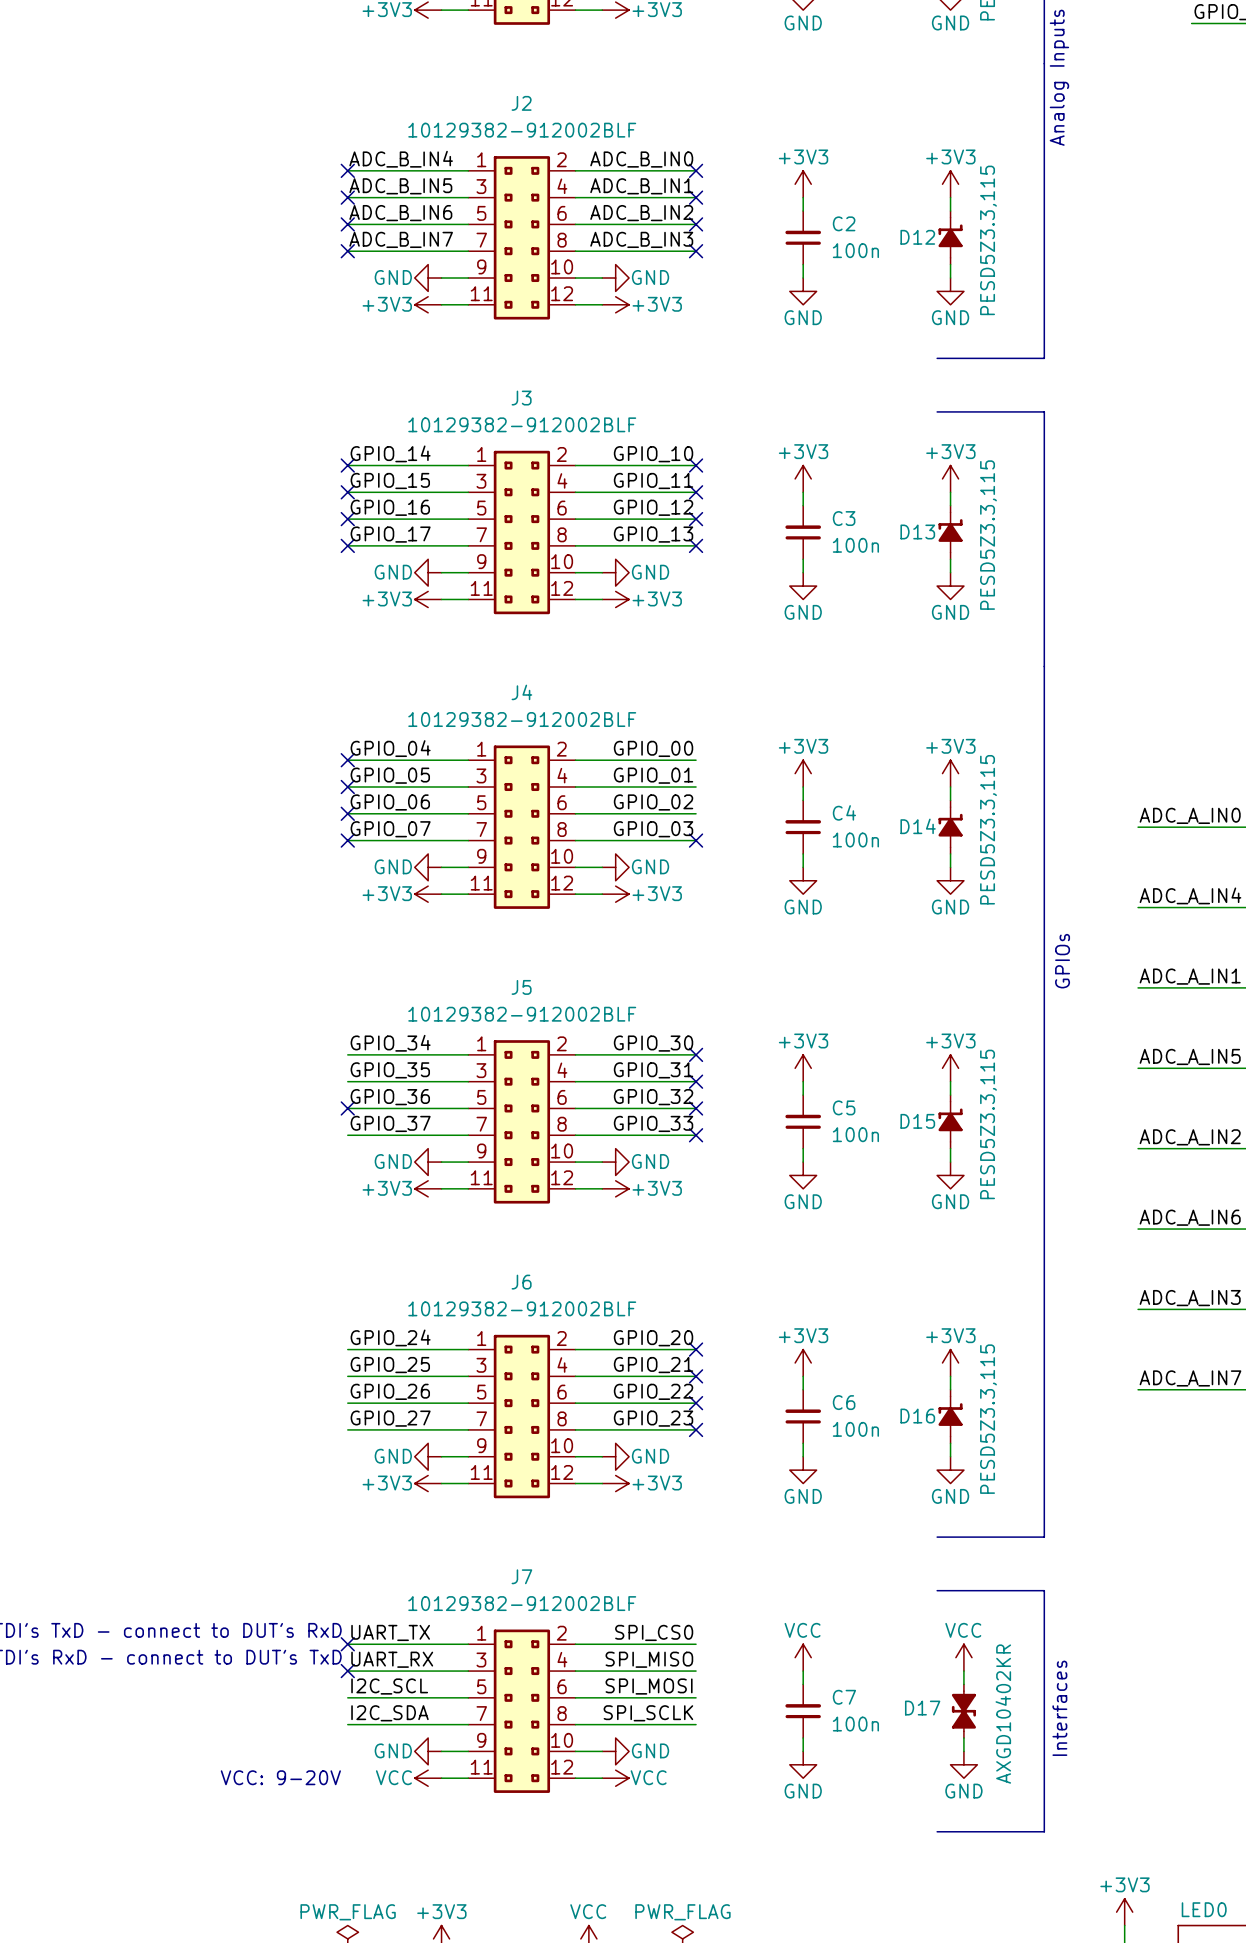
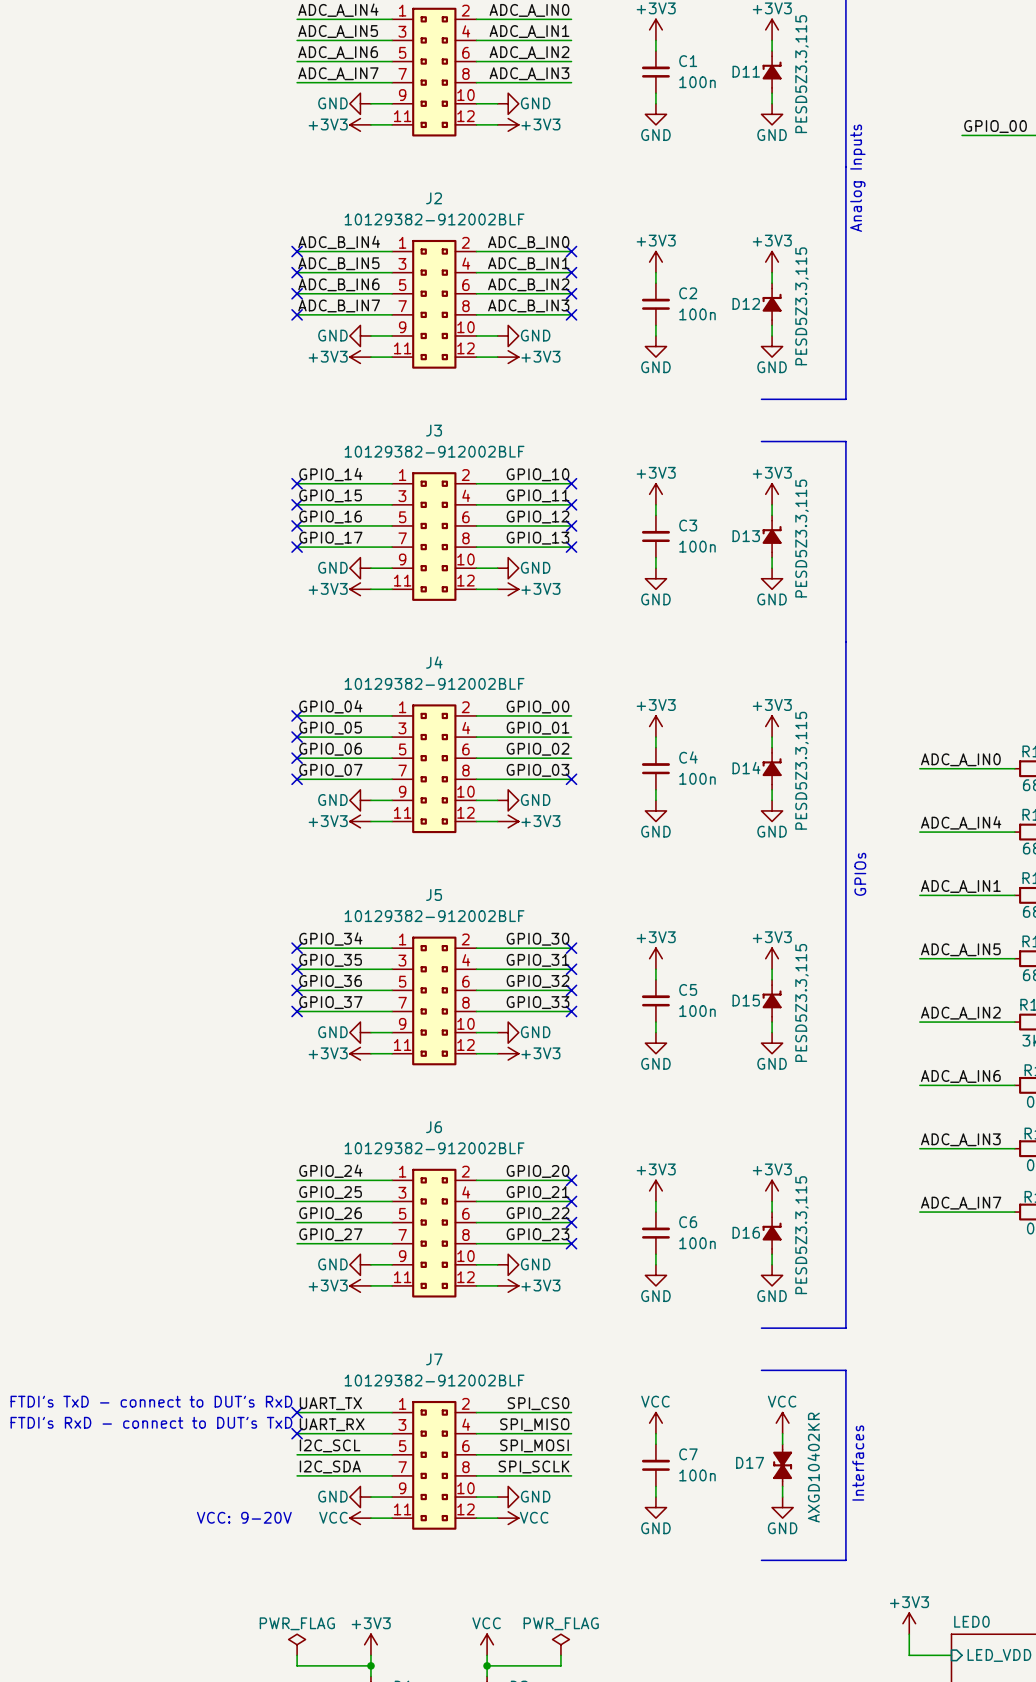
no-connect mark: none -> (297, 948)
no-connect mark: none -> (297, 969)
no-connect mark: none -> (297, 1011)

